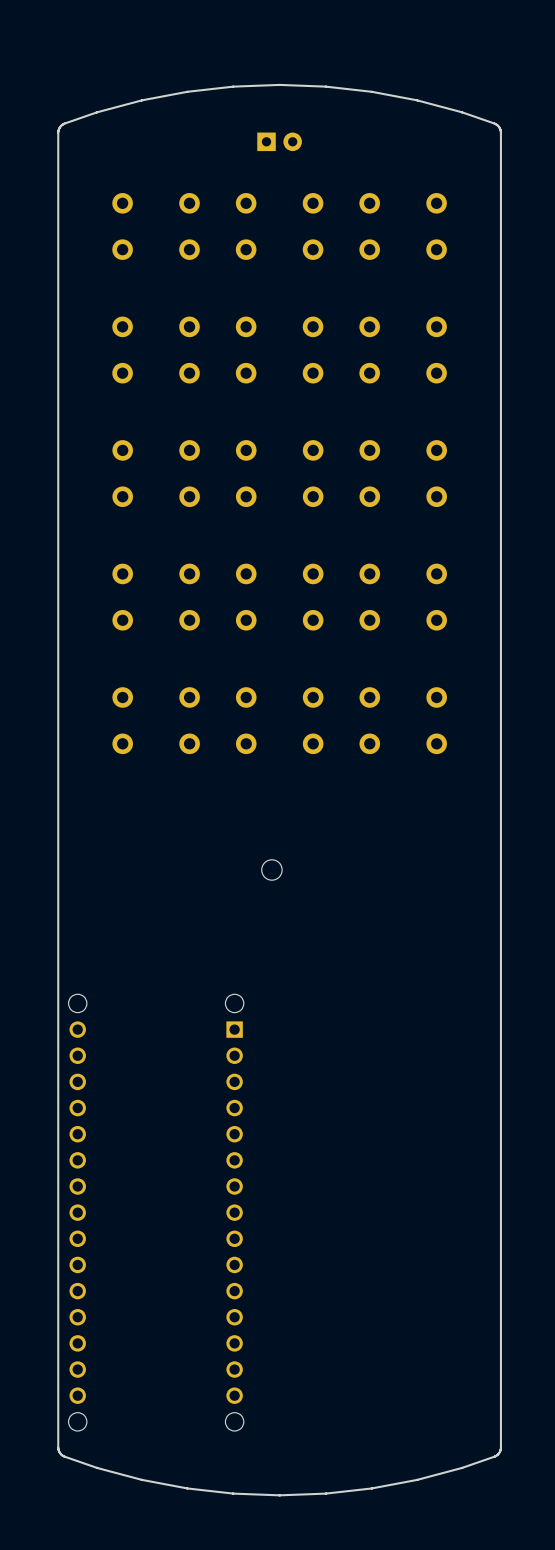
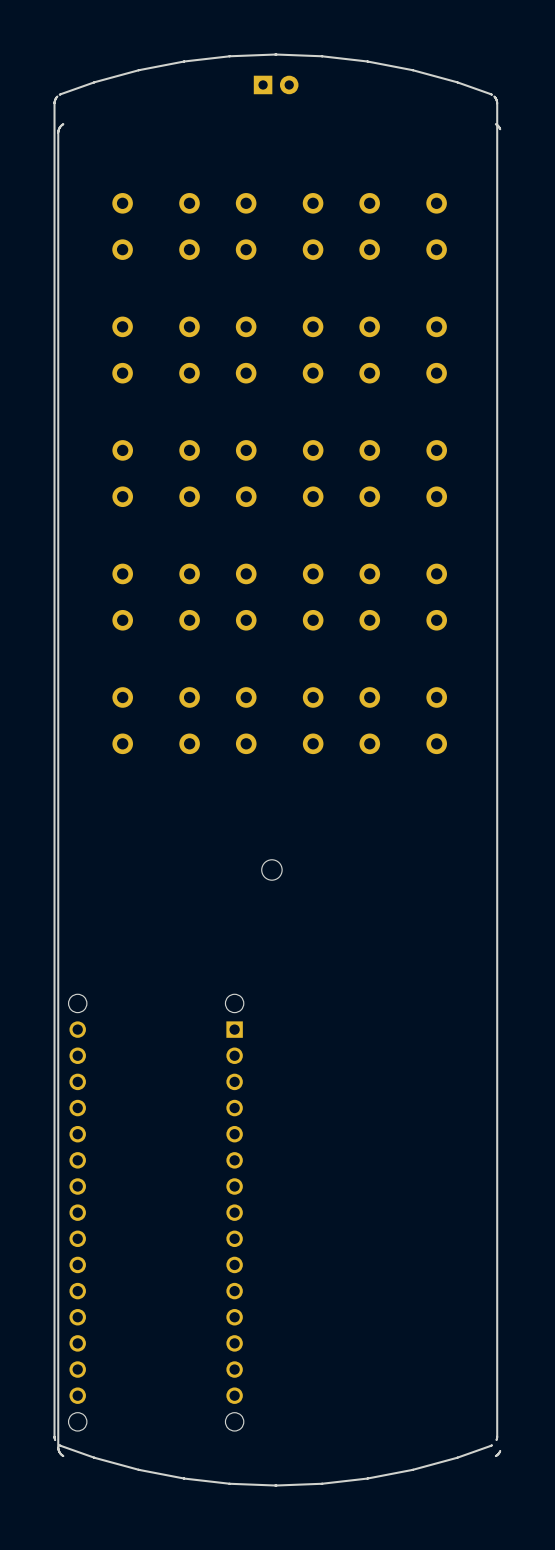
board edge: none -> (492, 94) (457, 82) (413, 70) (367, 61) (321, 56) (275, 54) (229, 56) (184, 61) (138, 70) (94, 82) (59, 94)
board edge: none -> (57, 96) (54, 103) (55, 1440)
board edge: none -> (494, 96) (497, 103) (496, 1440)
board edge: (495, 124) (461, 112) (417, 100) (371, 91) (325, 86) (279, 84) (233, 86) (187, 91) (141, 100) (97, 112) (63, 124) -> none
board edge: (500, 129) (500, 1450) -> none
part position: (279, 141) -> (276, 84)
board edge: none -> (492, 1445) (457, 1457) (413, 1469) (367, 1478) (321, 1483) (275, 1485) (229, 1483) (184, 1478) (138, 1469) (94, 1457) (59, 1445)
board edge: (495, 1456) (461, 1468) (417, 1479) (371, 1488) (325, 1493) (279, 1495) (233, 1493) (187, 1488) (141, 1479) (97, 1468) (63, 1456) -> none

